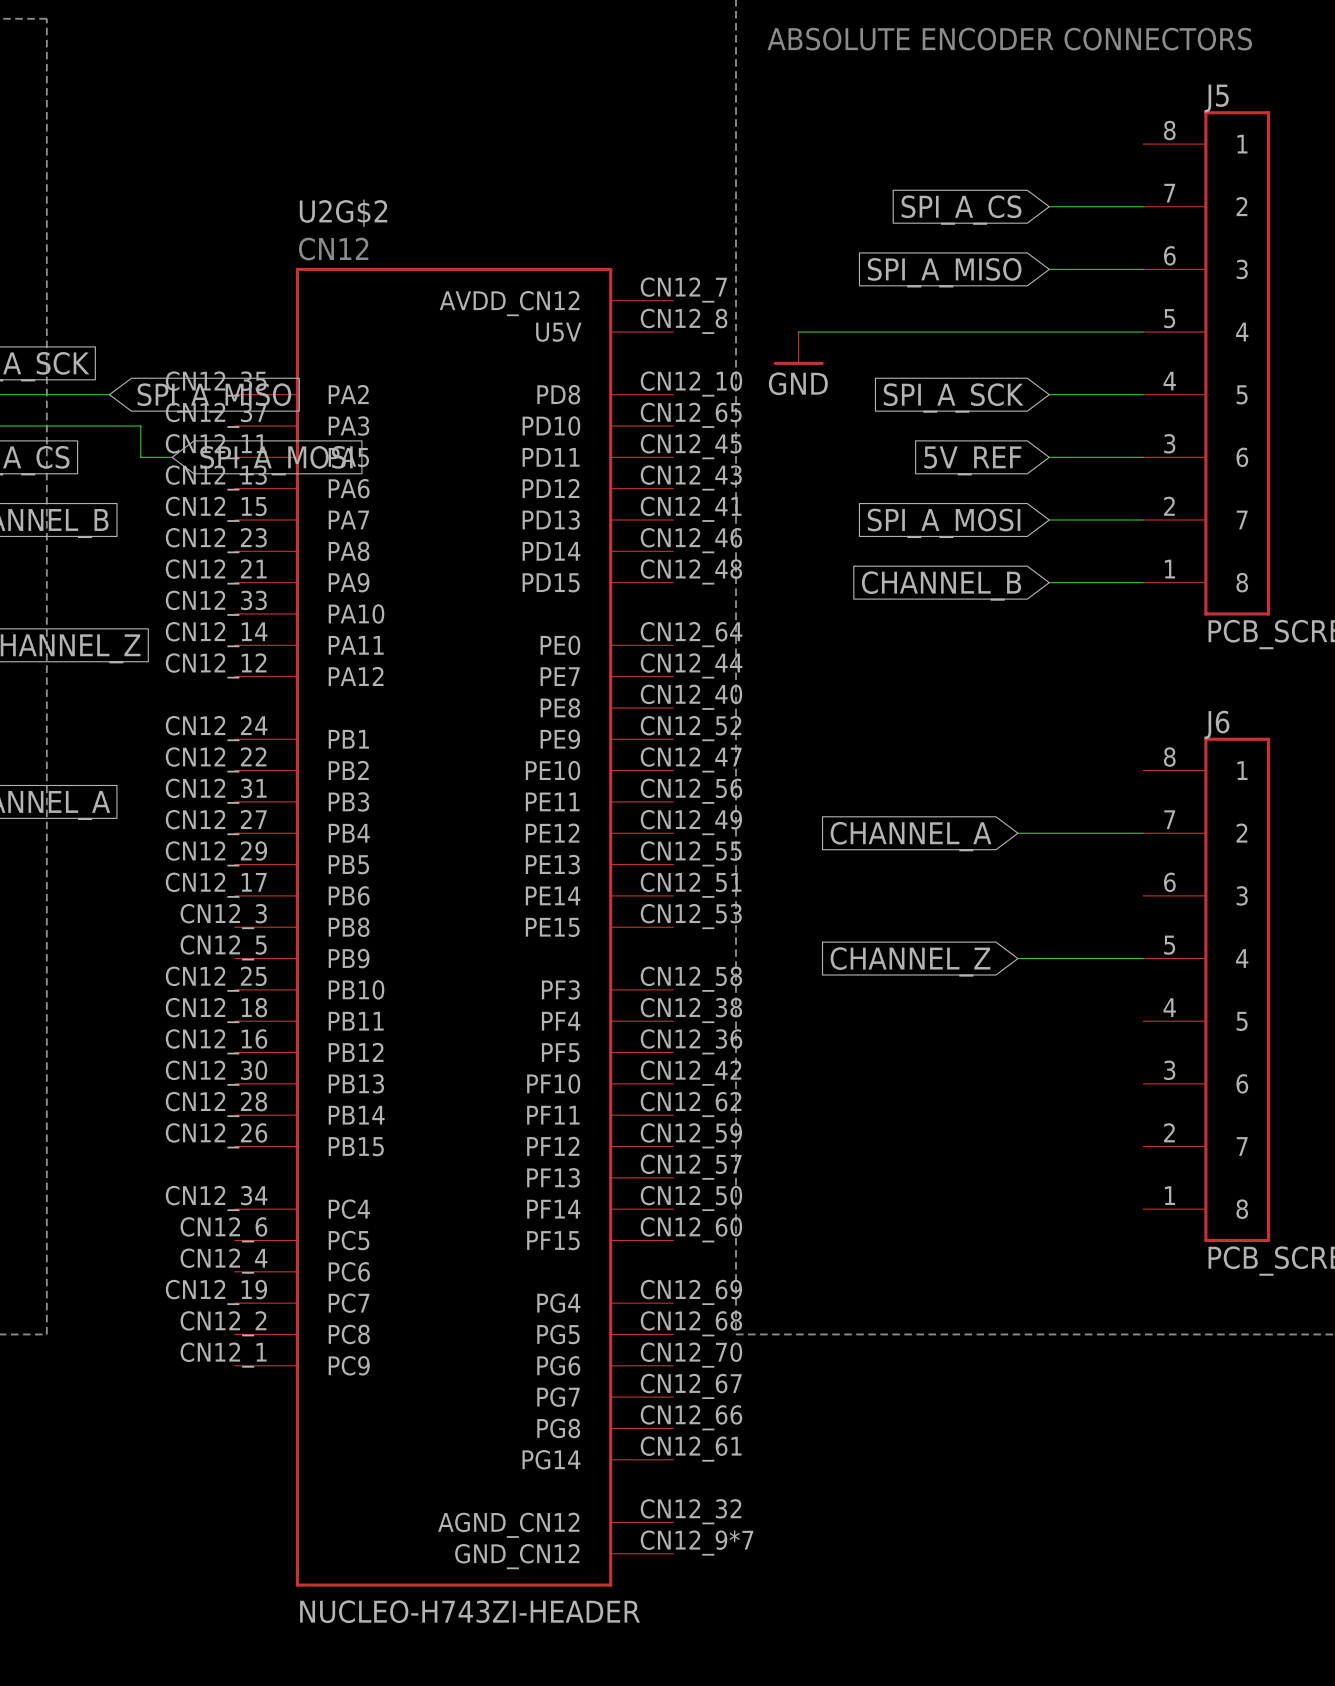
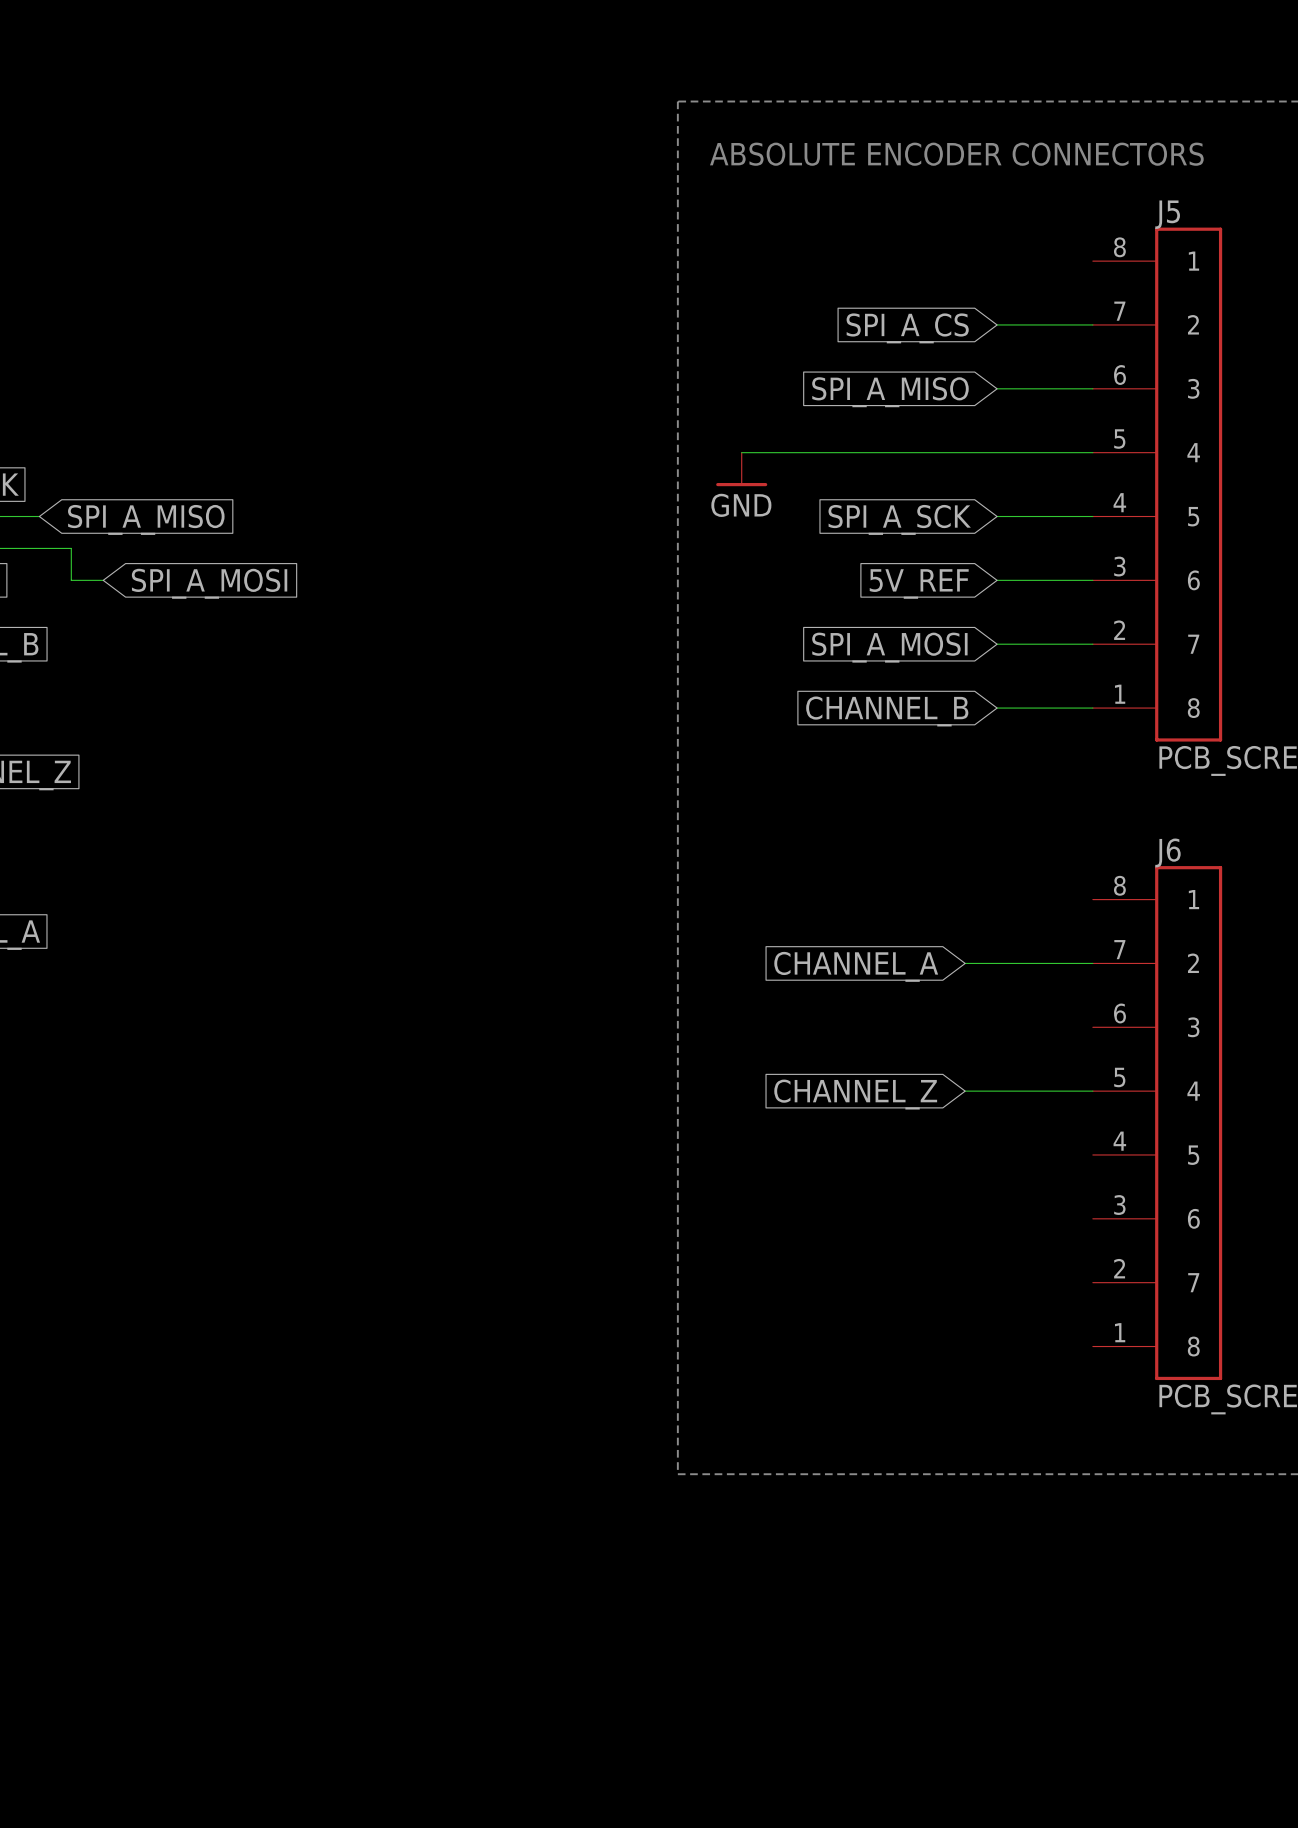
U2G$2: NUCLEO-H743ZI-HEADER (454, 927) -> none

